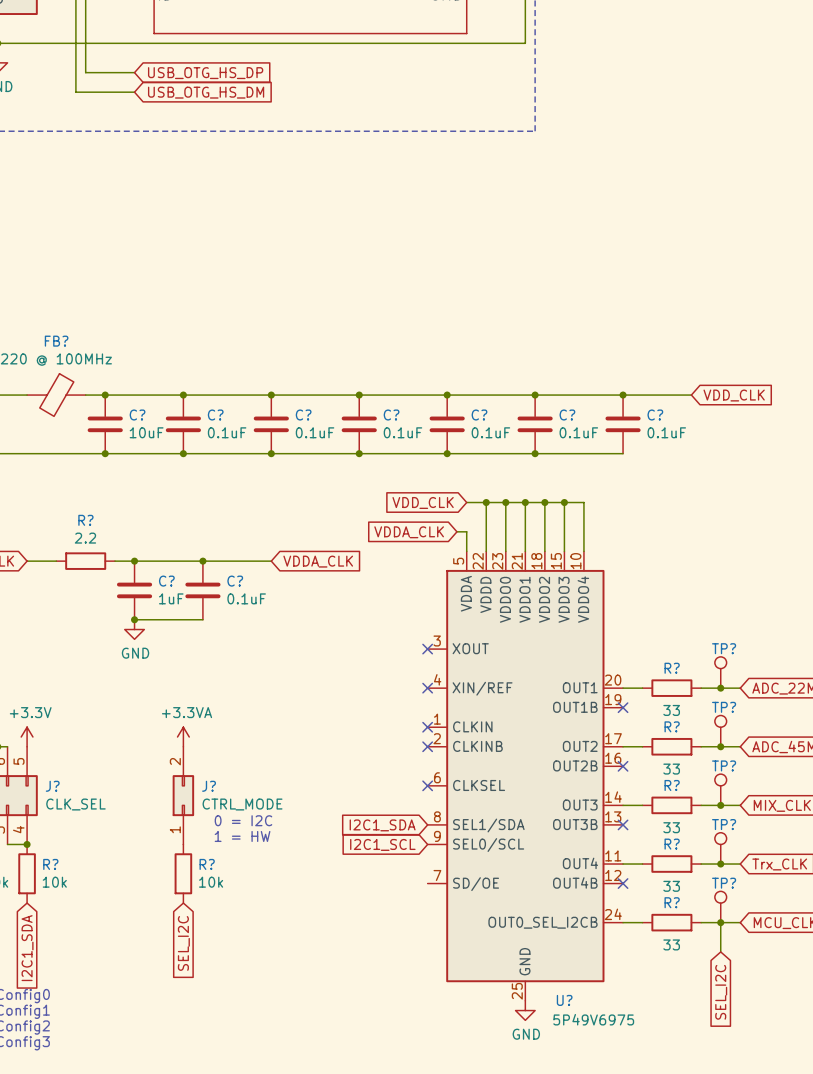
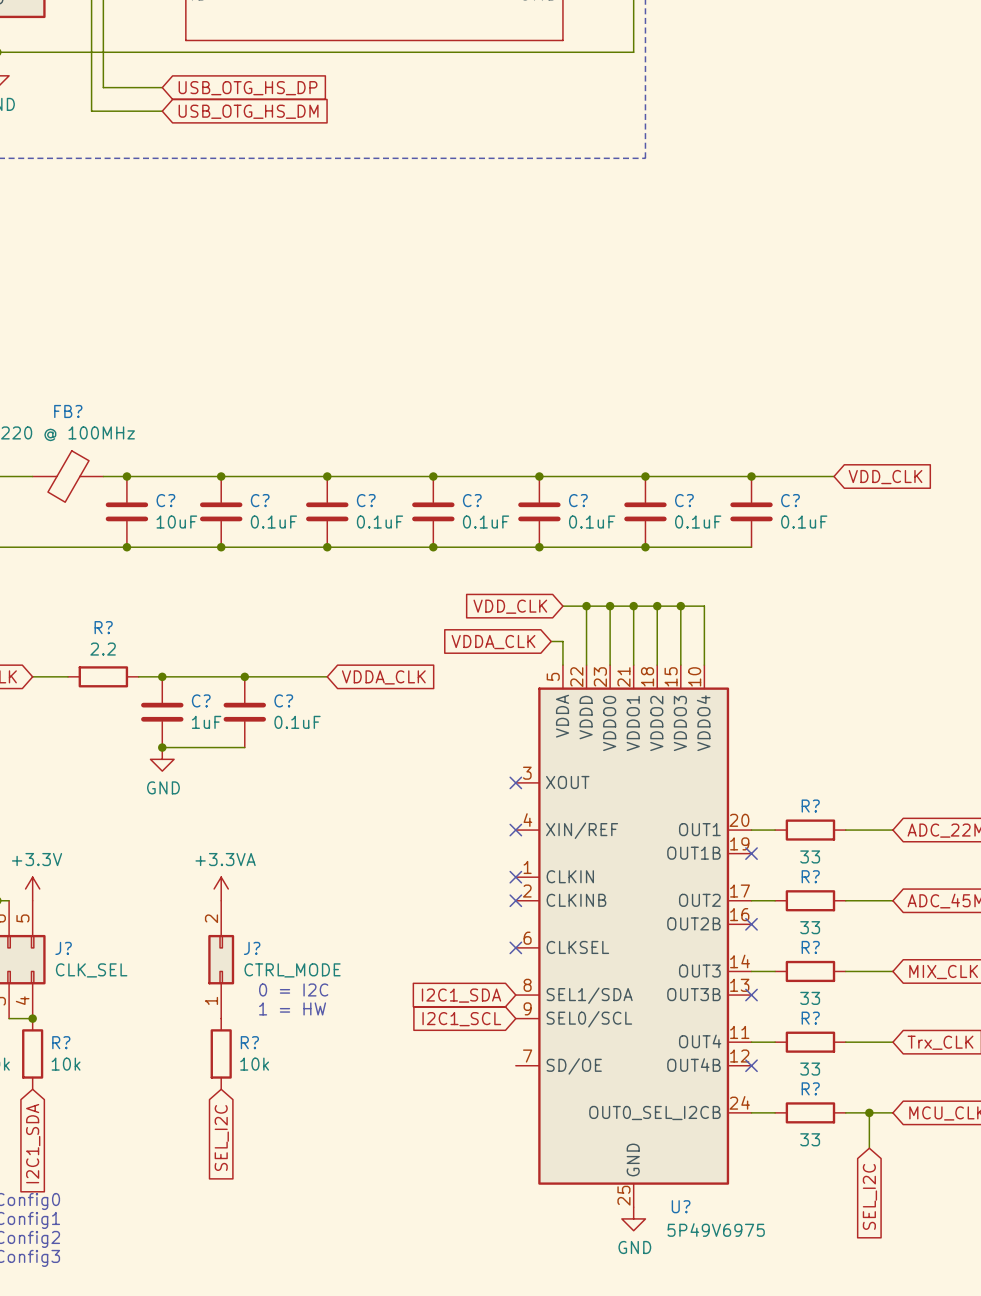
TP?: (720, 672) -> none
junction: (720, 688) -> none
TP?: (720, 731) -> none
junction: (720, 746) -> none
TP?: (720, 789) -> none
junction: (720, 805) -> none
TP?: (720, 848) -> none
junction: (720, 864) -> none
TP?: (720, 906) -> none

